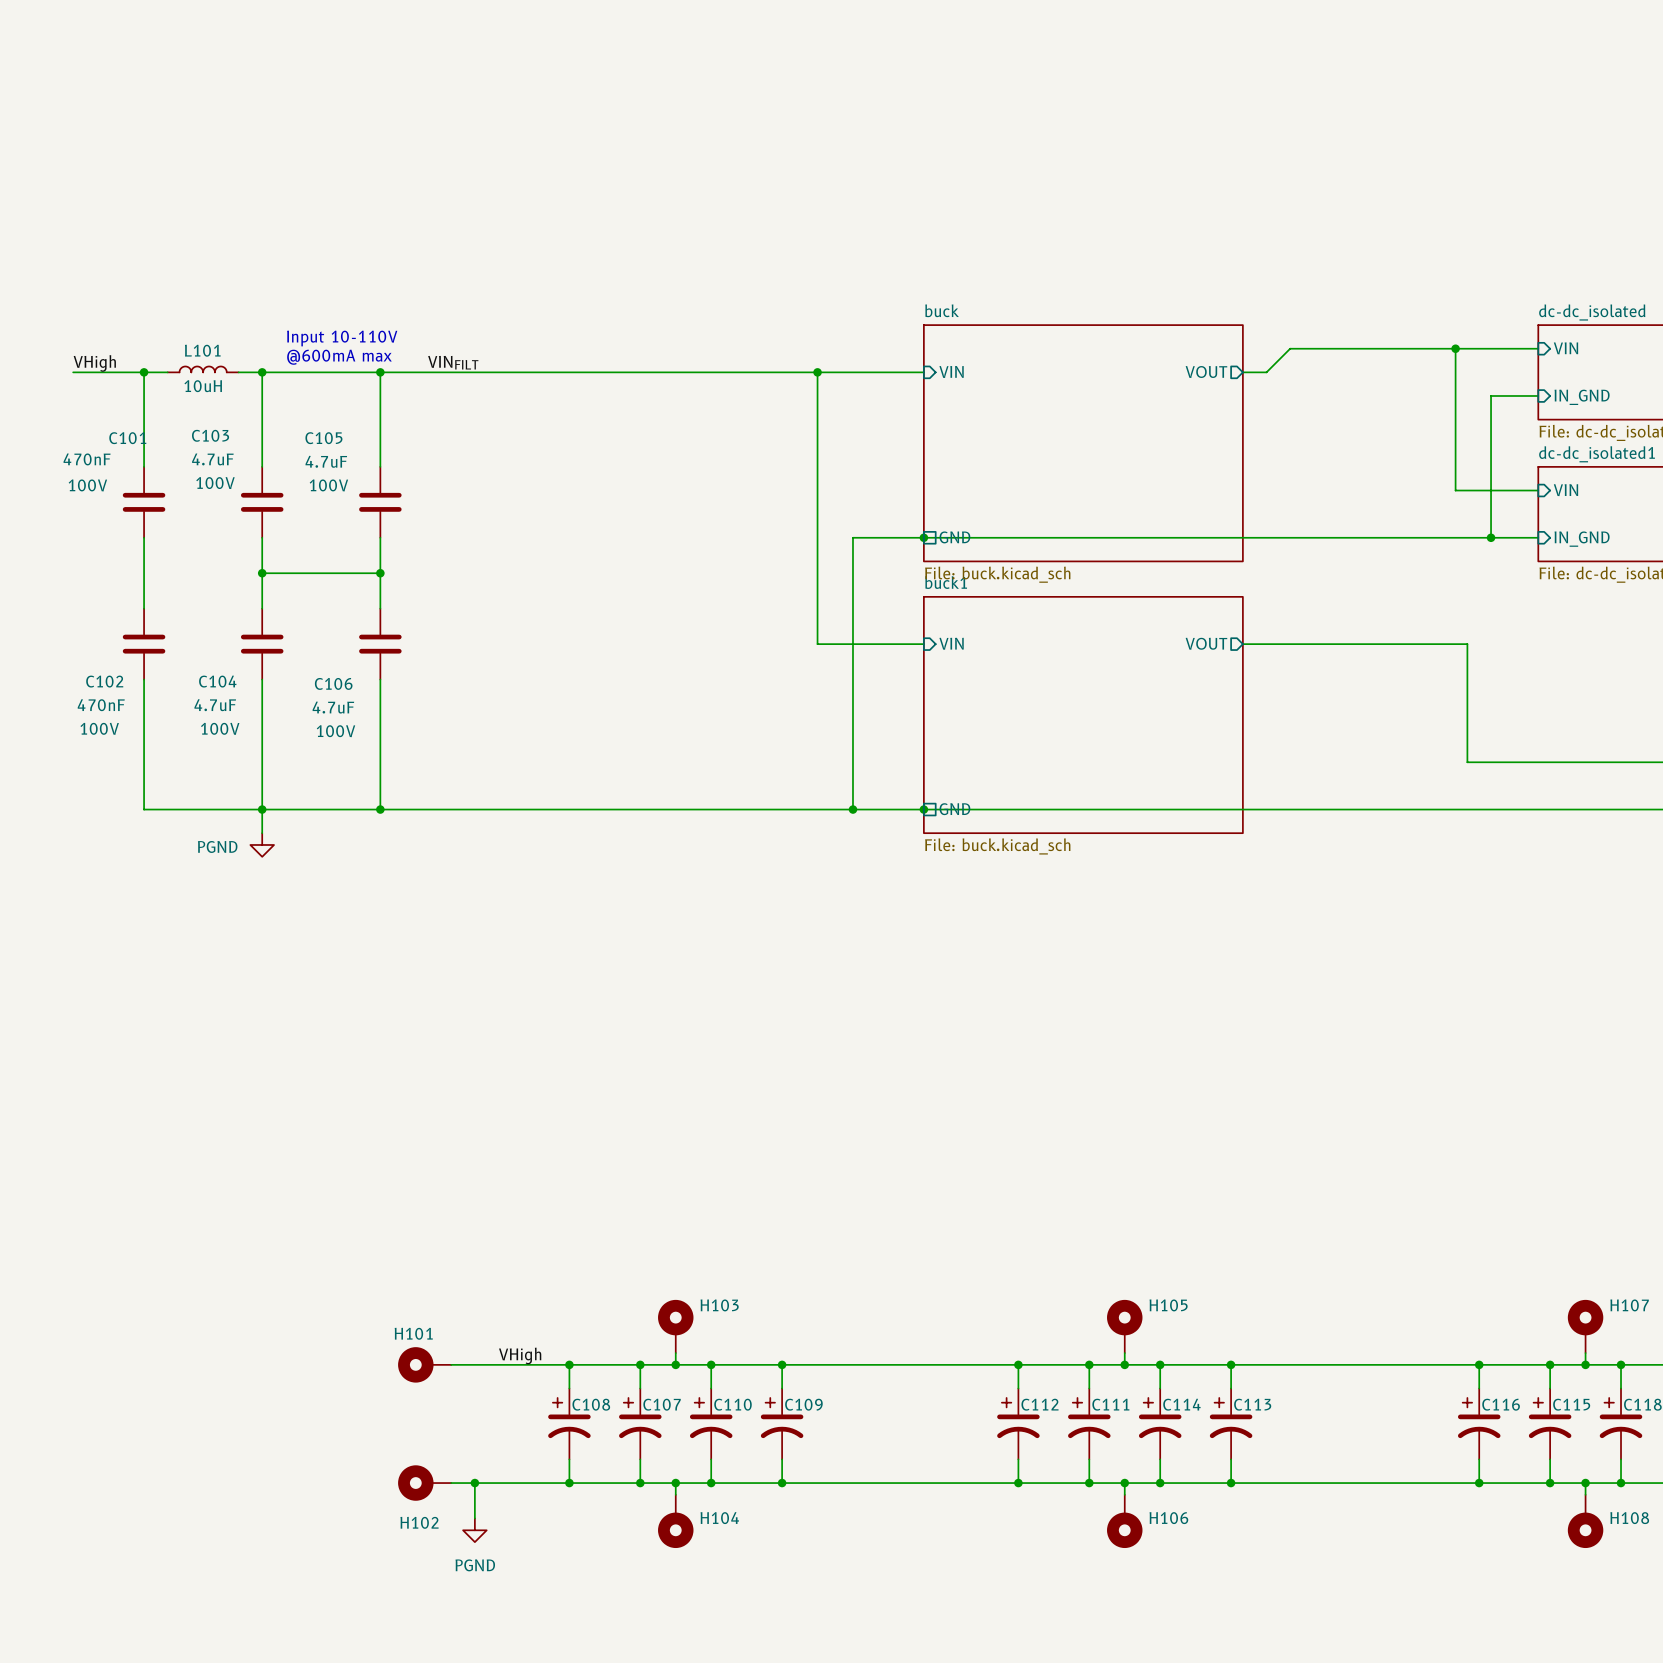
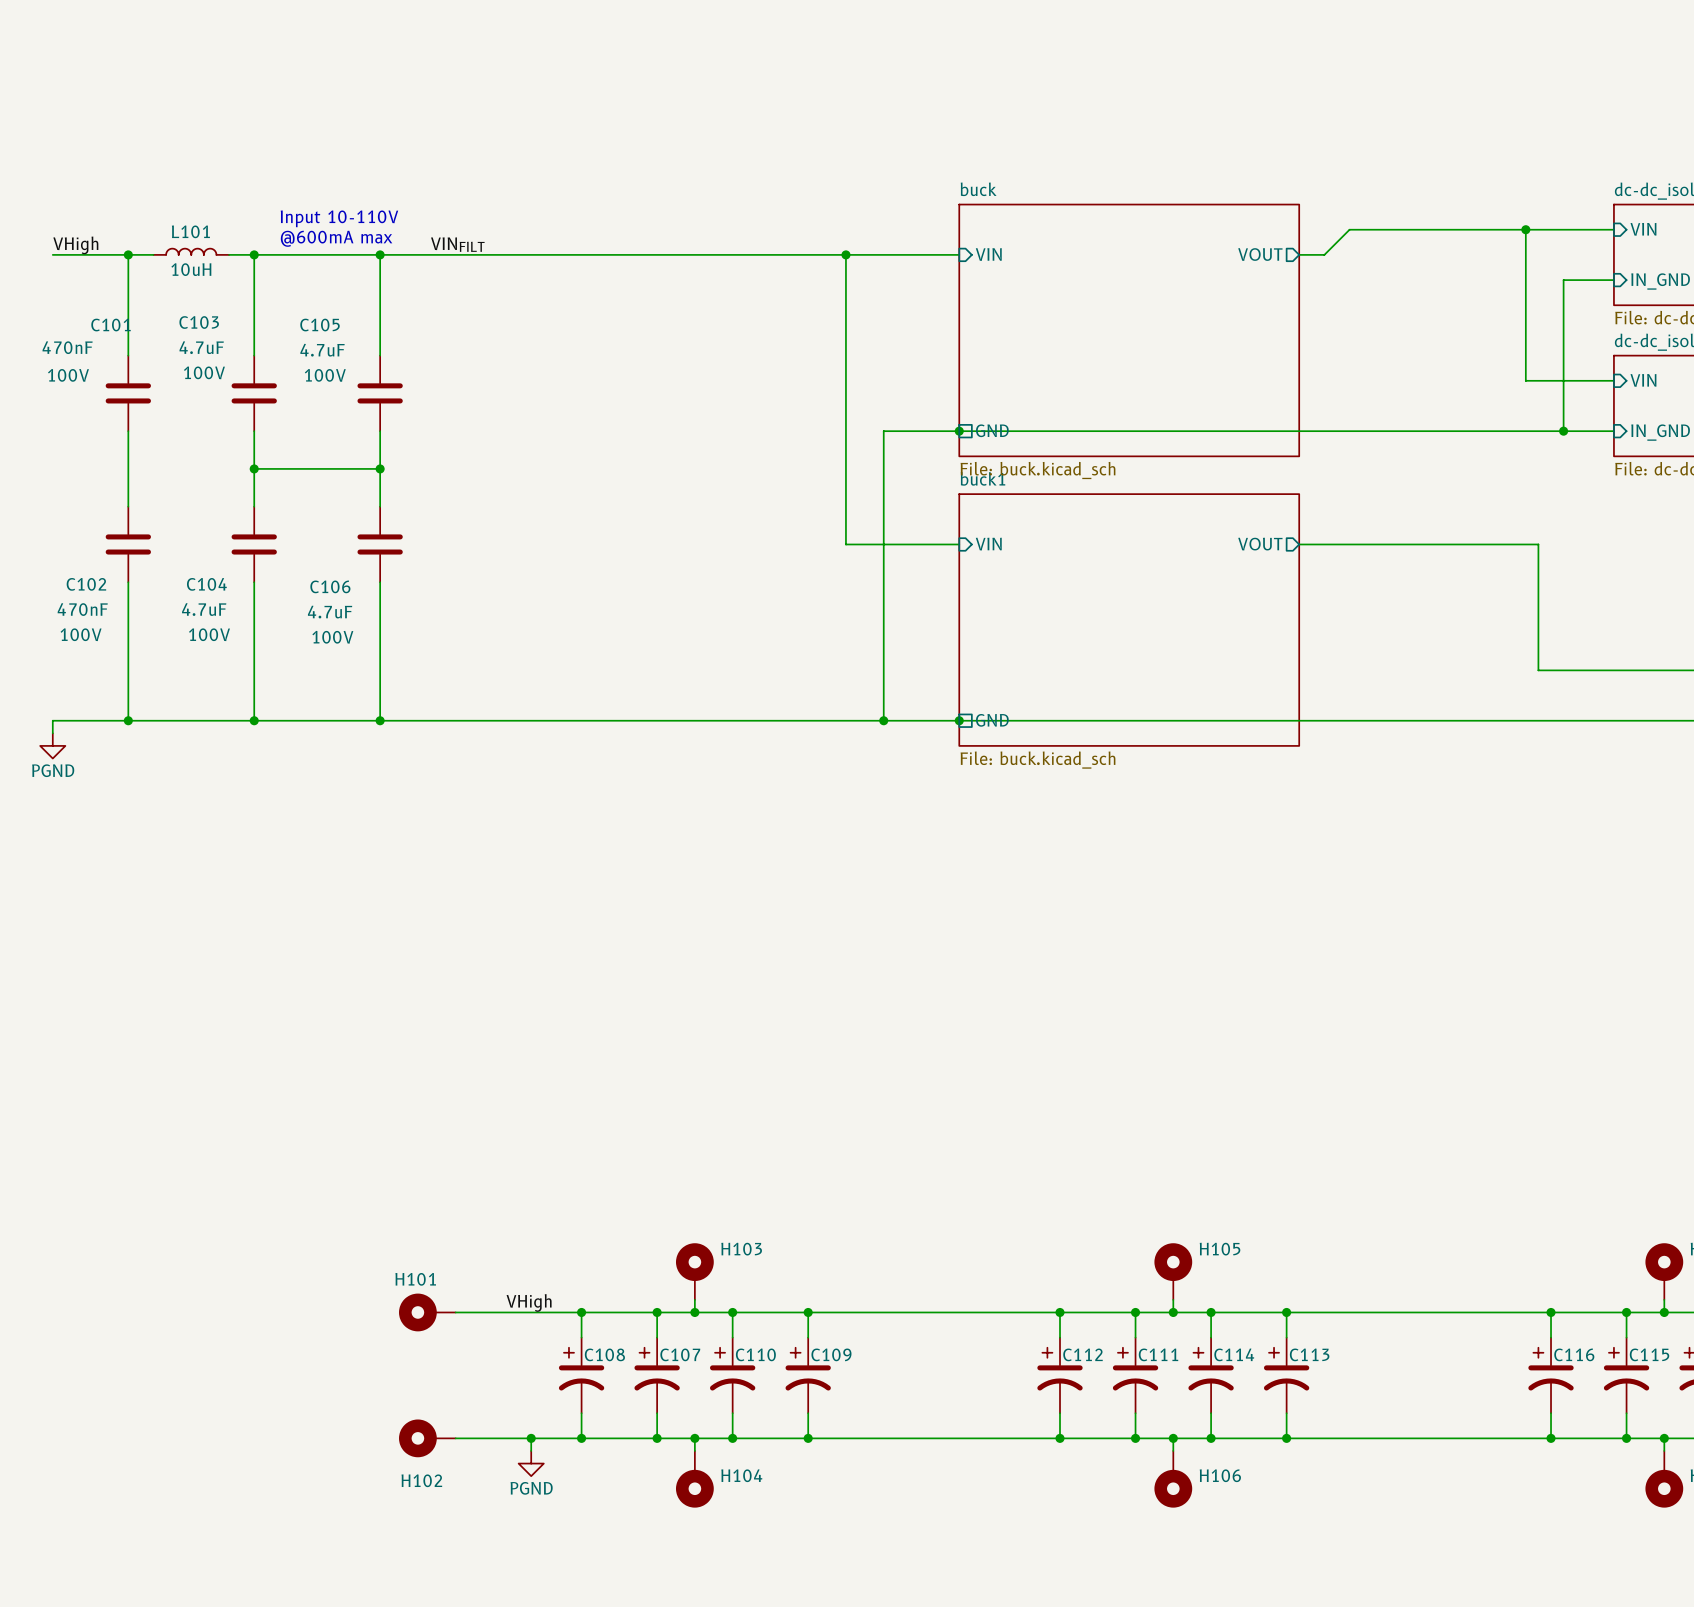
wire: none -> (128, 720) (52, 720) (52, 733)
junction: none -> (128, 720)
wire: (262, 809) (262, 833) -> none
power symbol position: PGND (262, 844) -> PGND (52, 745)
power symbol text position: PGND (217, 846) -> PGND (53, 770)
wire: (474, 1483) (474, 1518) -> none
junction position: (474, 1483) -> (531, 1438)
wire: none -> (531, 1438) (531, 1450)
power symbol position: PGND (474, 1530) -> PGND (531, 1463)
power symbol text position: PGND (475, 1565) -> PGND (531, 1488)

